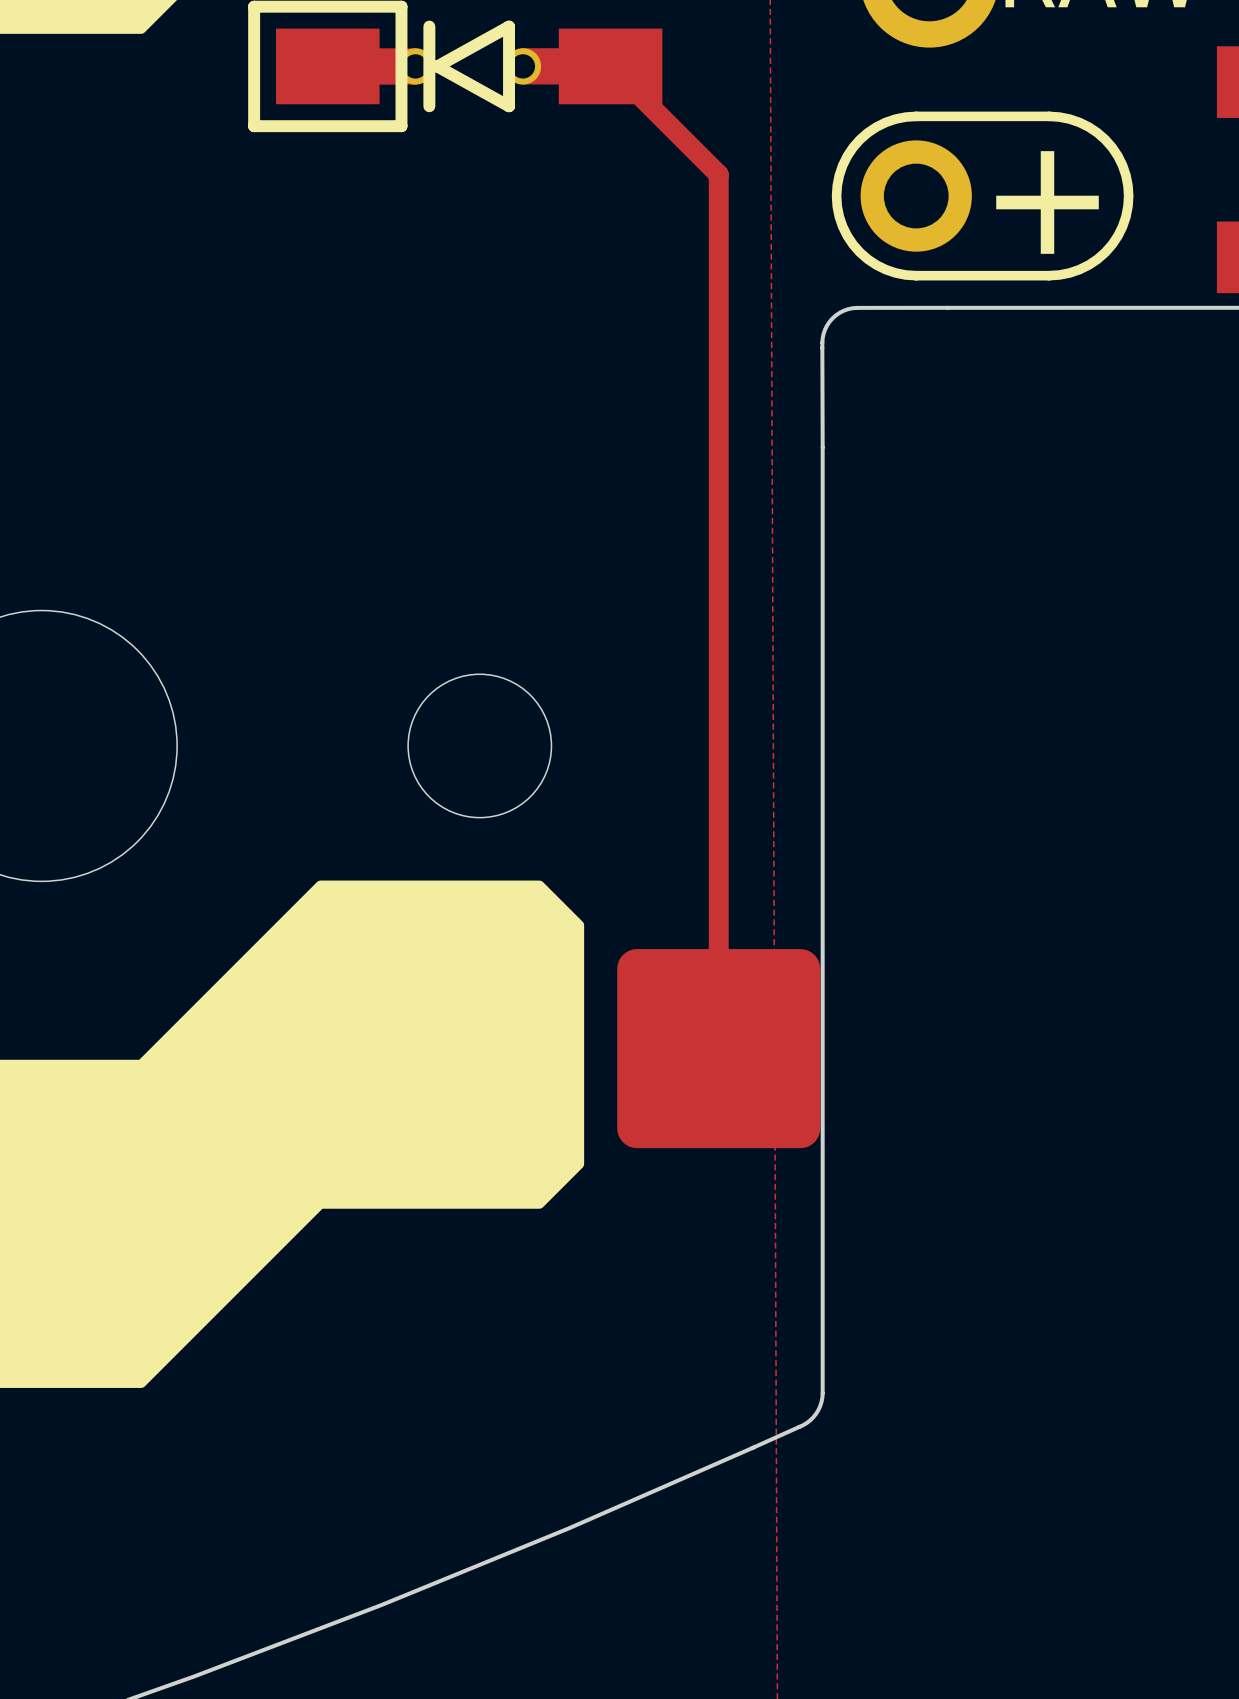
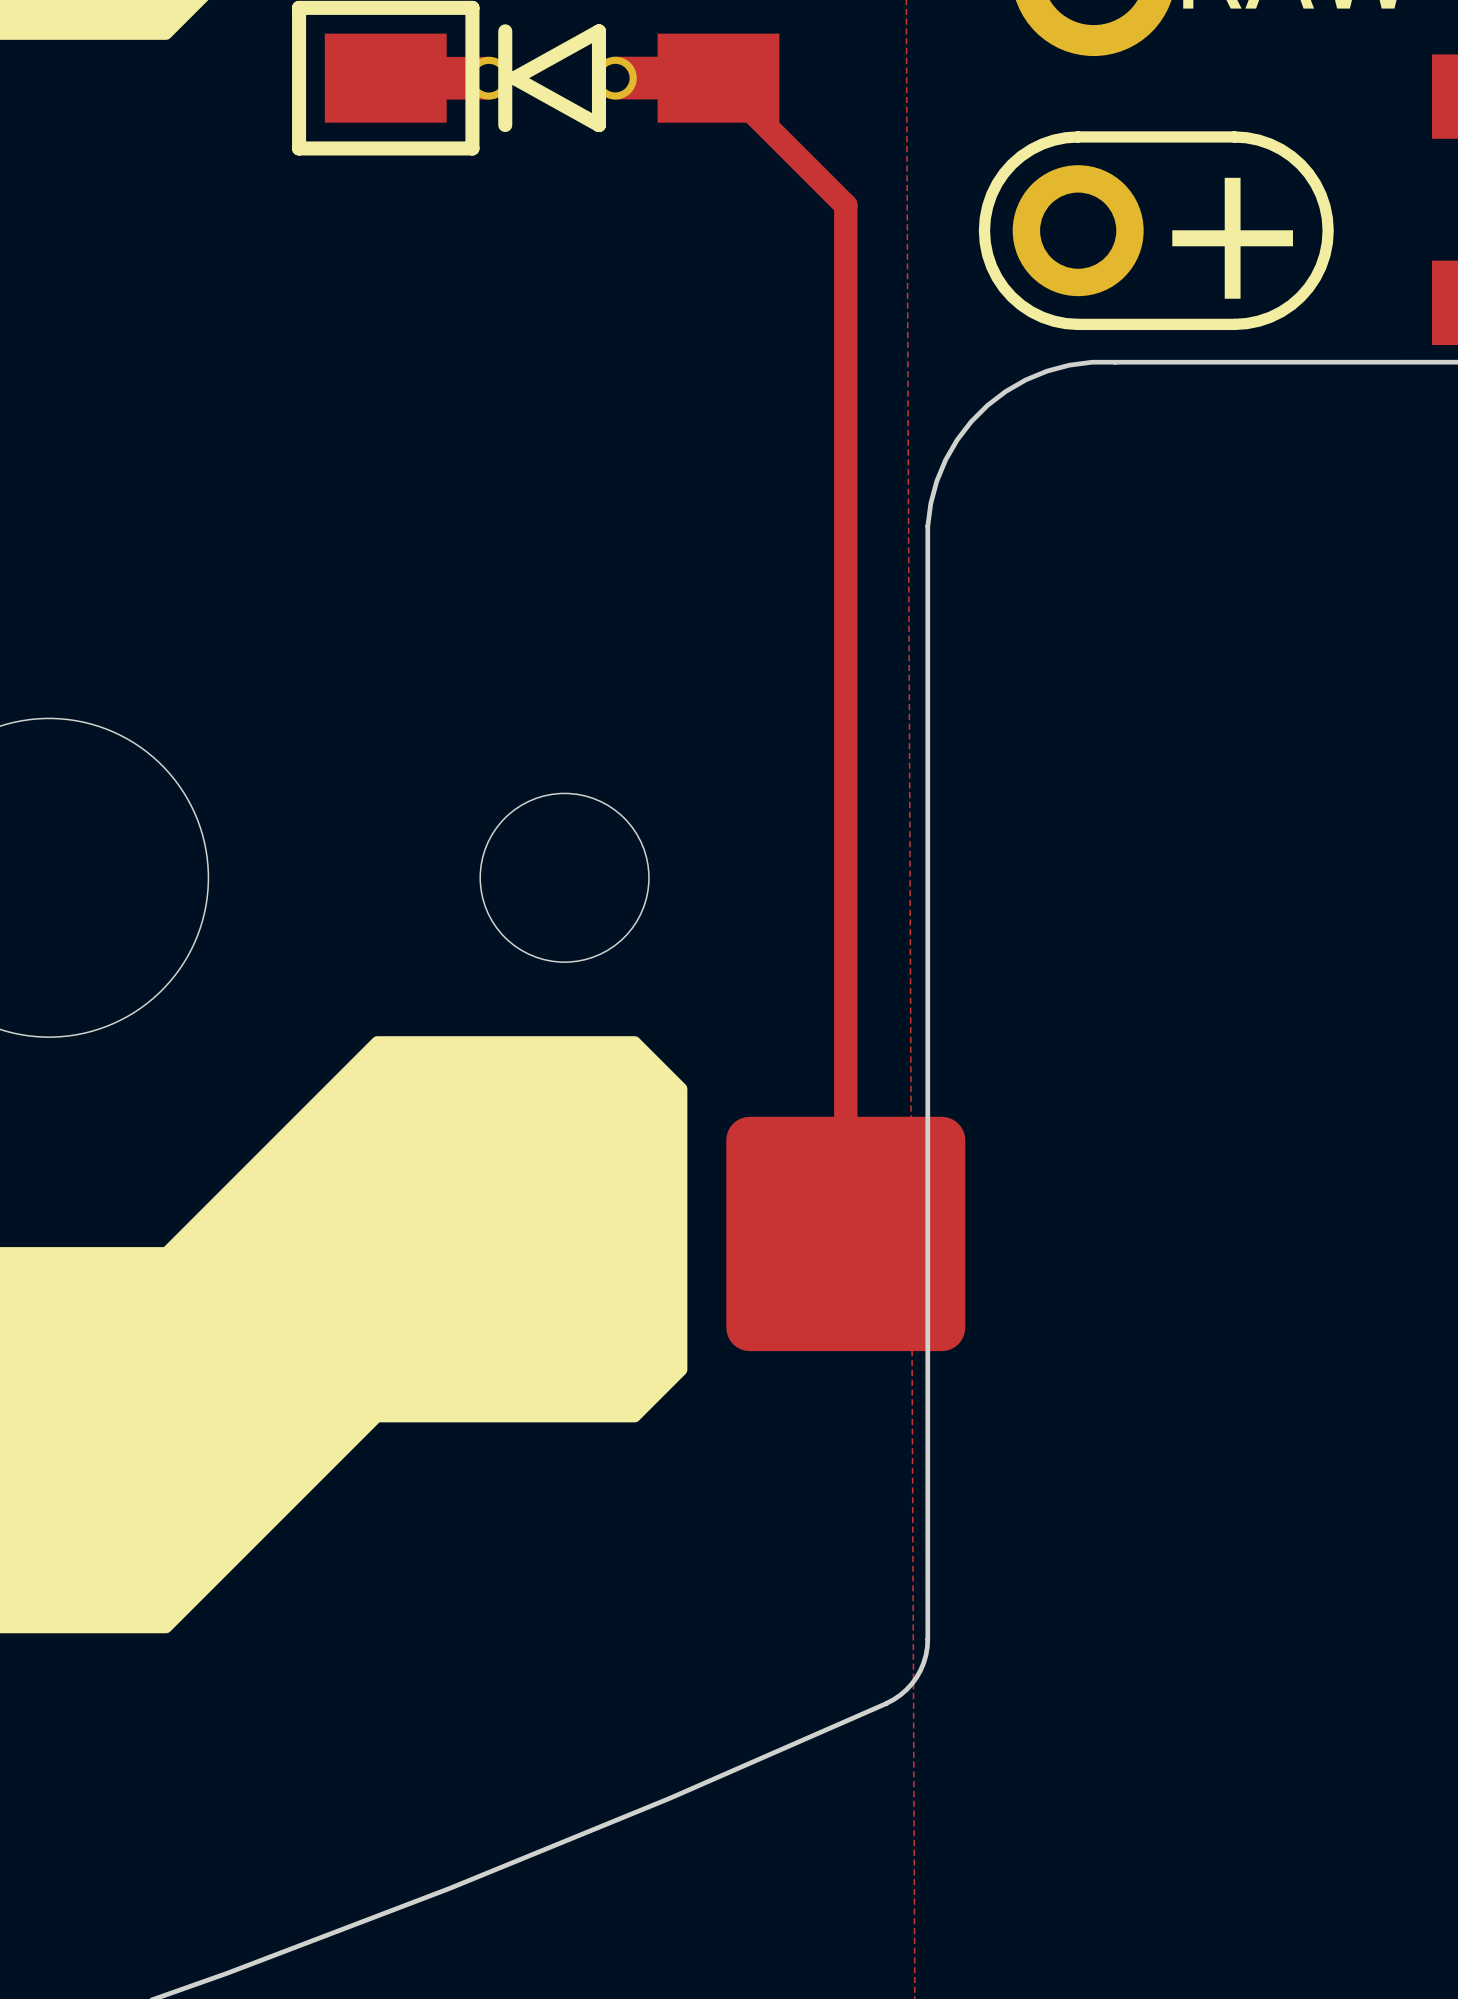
board edge: (947, 307) (847, 309) (839, 312) (829, 321) (822, 338) (822, 1393) (818, 1409) (810, 1420) (753, 1447) -> (1115, 362) (1092, 362) (1069, 365) (1047, 371) (1025, 379) (1005, 391) (987, 405) (971, 421) (957, 439) (945, 459) (936, 481) (930, 503) (927, 526) (927, 1639) (923, 1663) (916, 1677) (900, 1695) (886, 1703)

